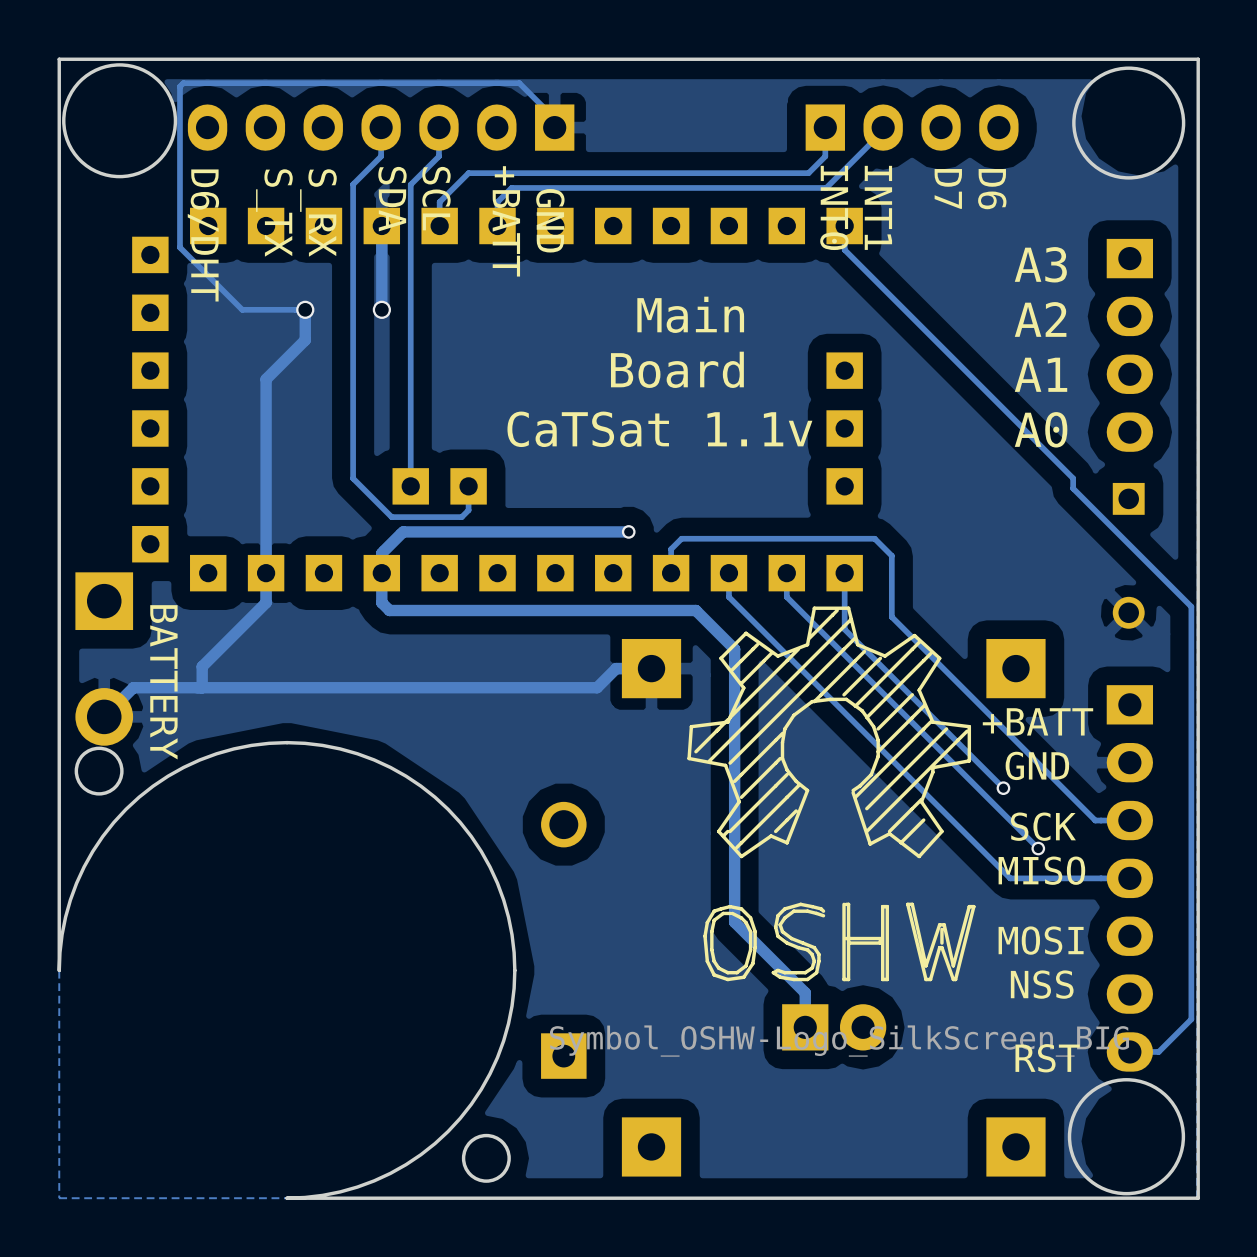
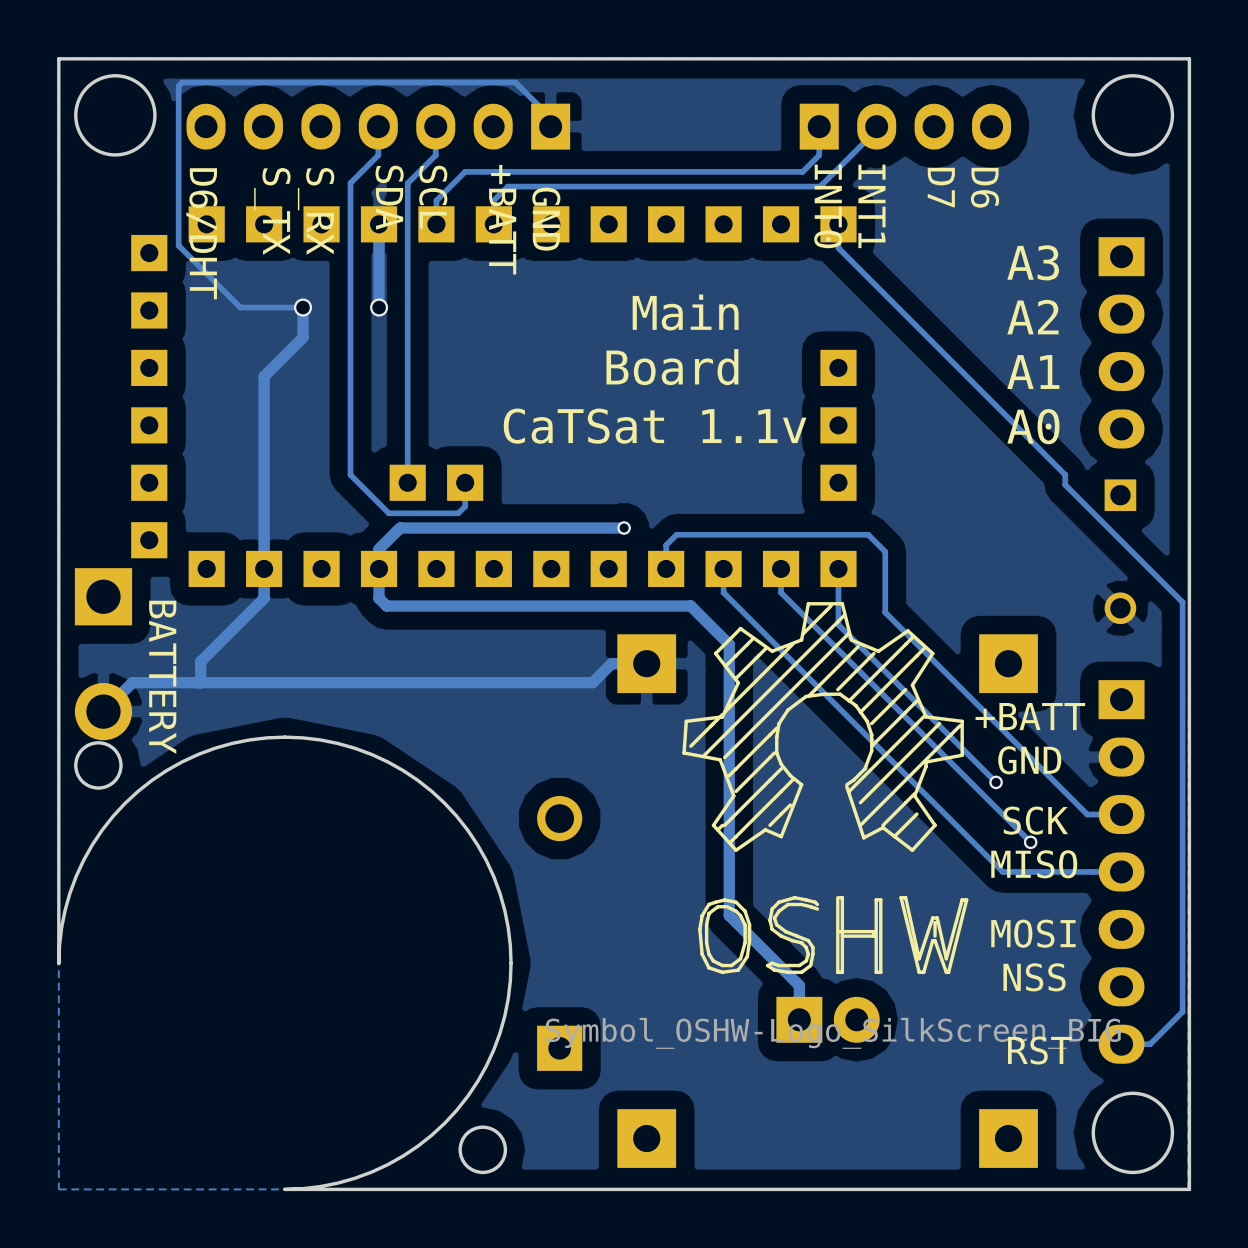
round board edge size: [62, 63, 178, 179] -> [74, 74, 157, 157]
round board edge size: [1072, 66, 1186, 180] -> [1091, 74, 1175, 157]
round board edge size: [1067, 1078, 1186, 1196] -> [1091, 1091, 1175, 1175]

